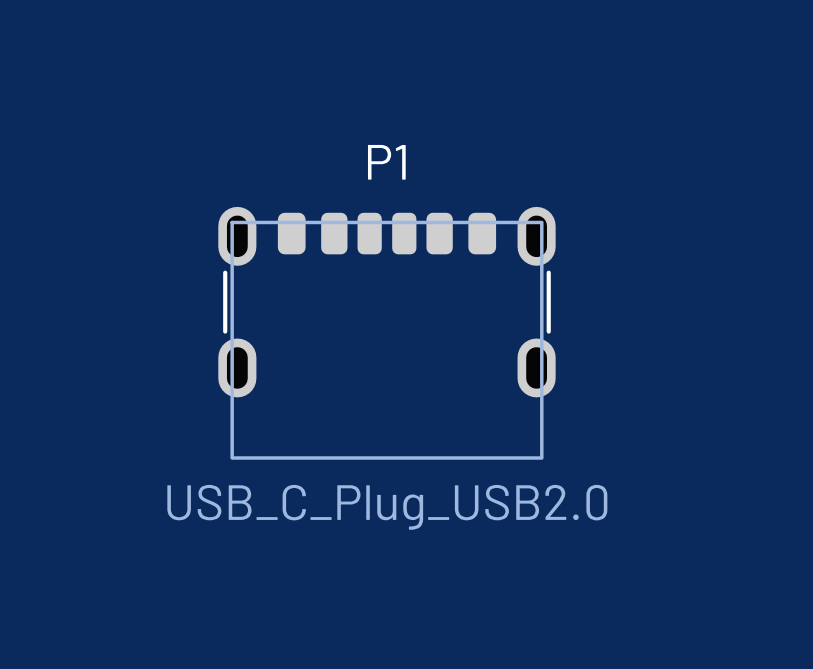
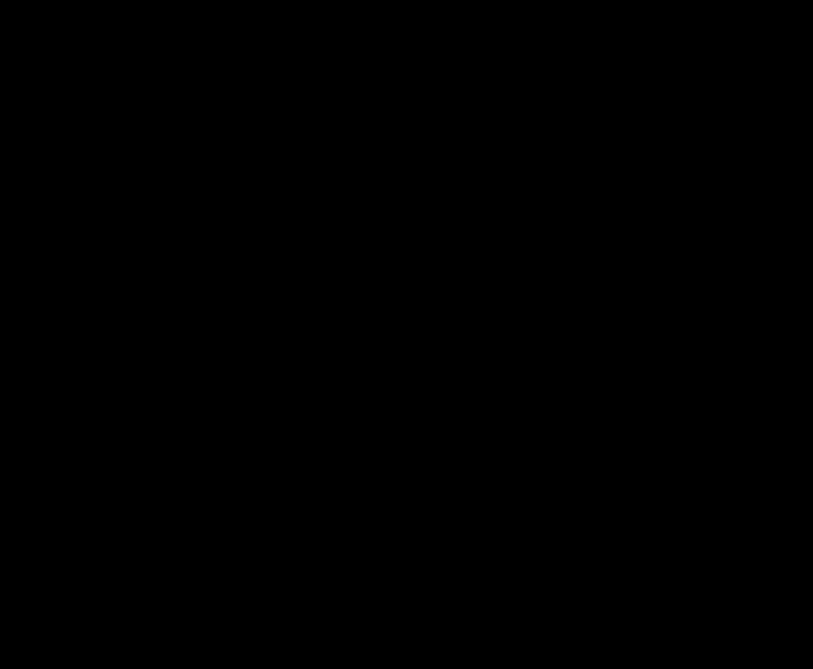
P1: USB_C_Plug_USB2.0 (386, 333) -> none

